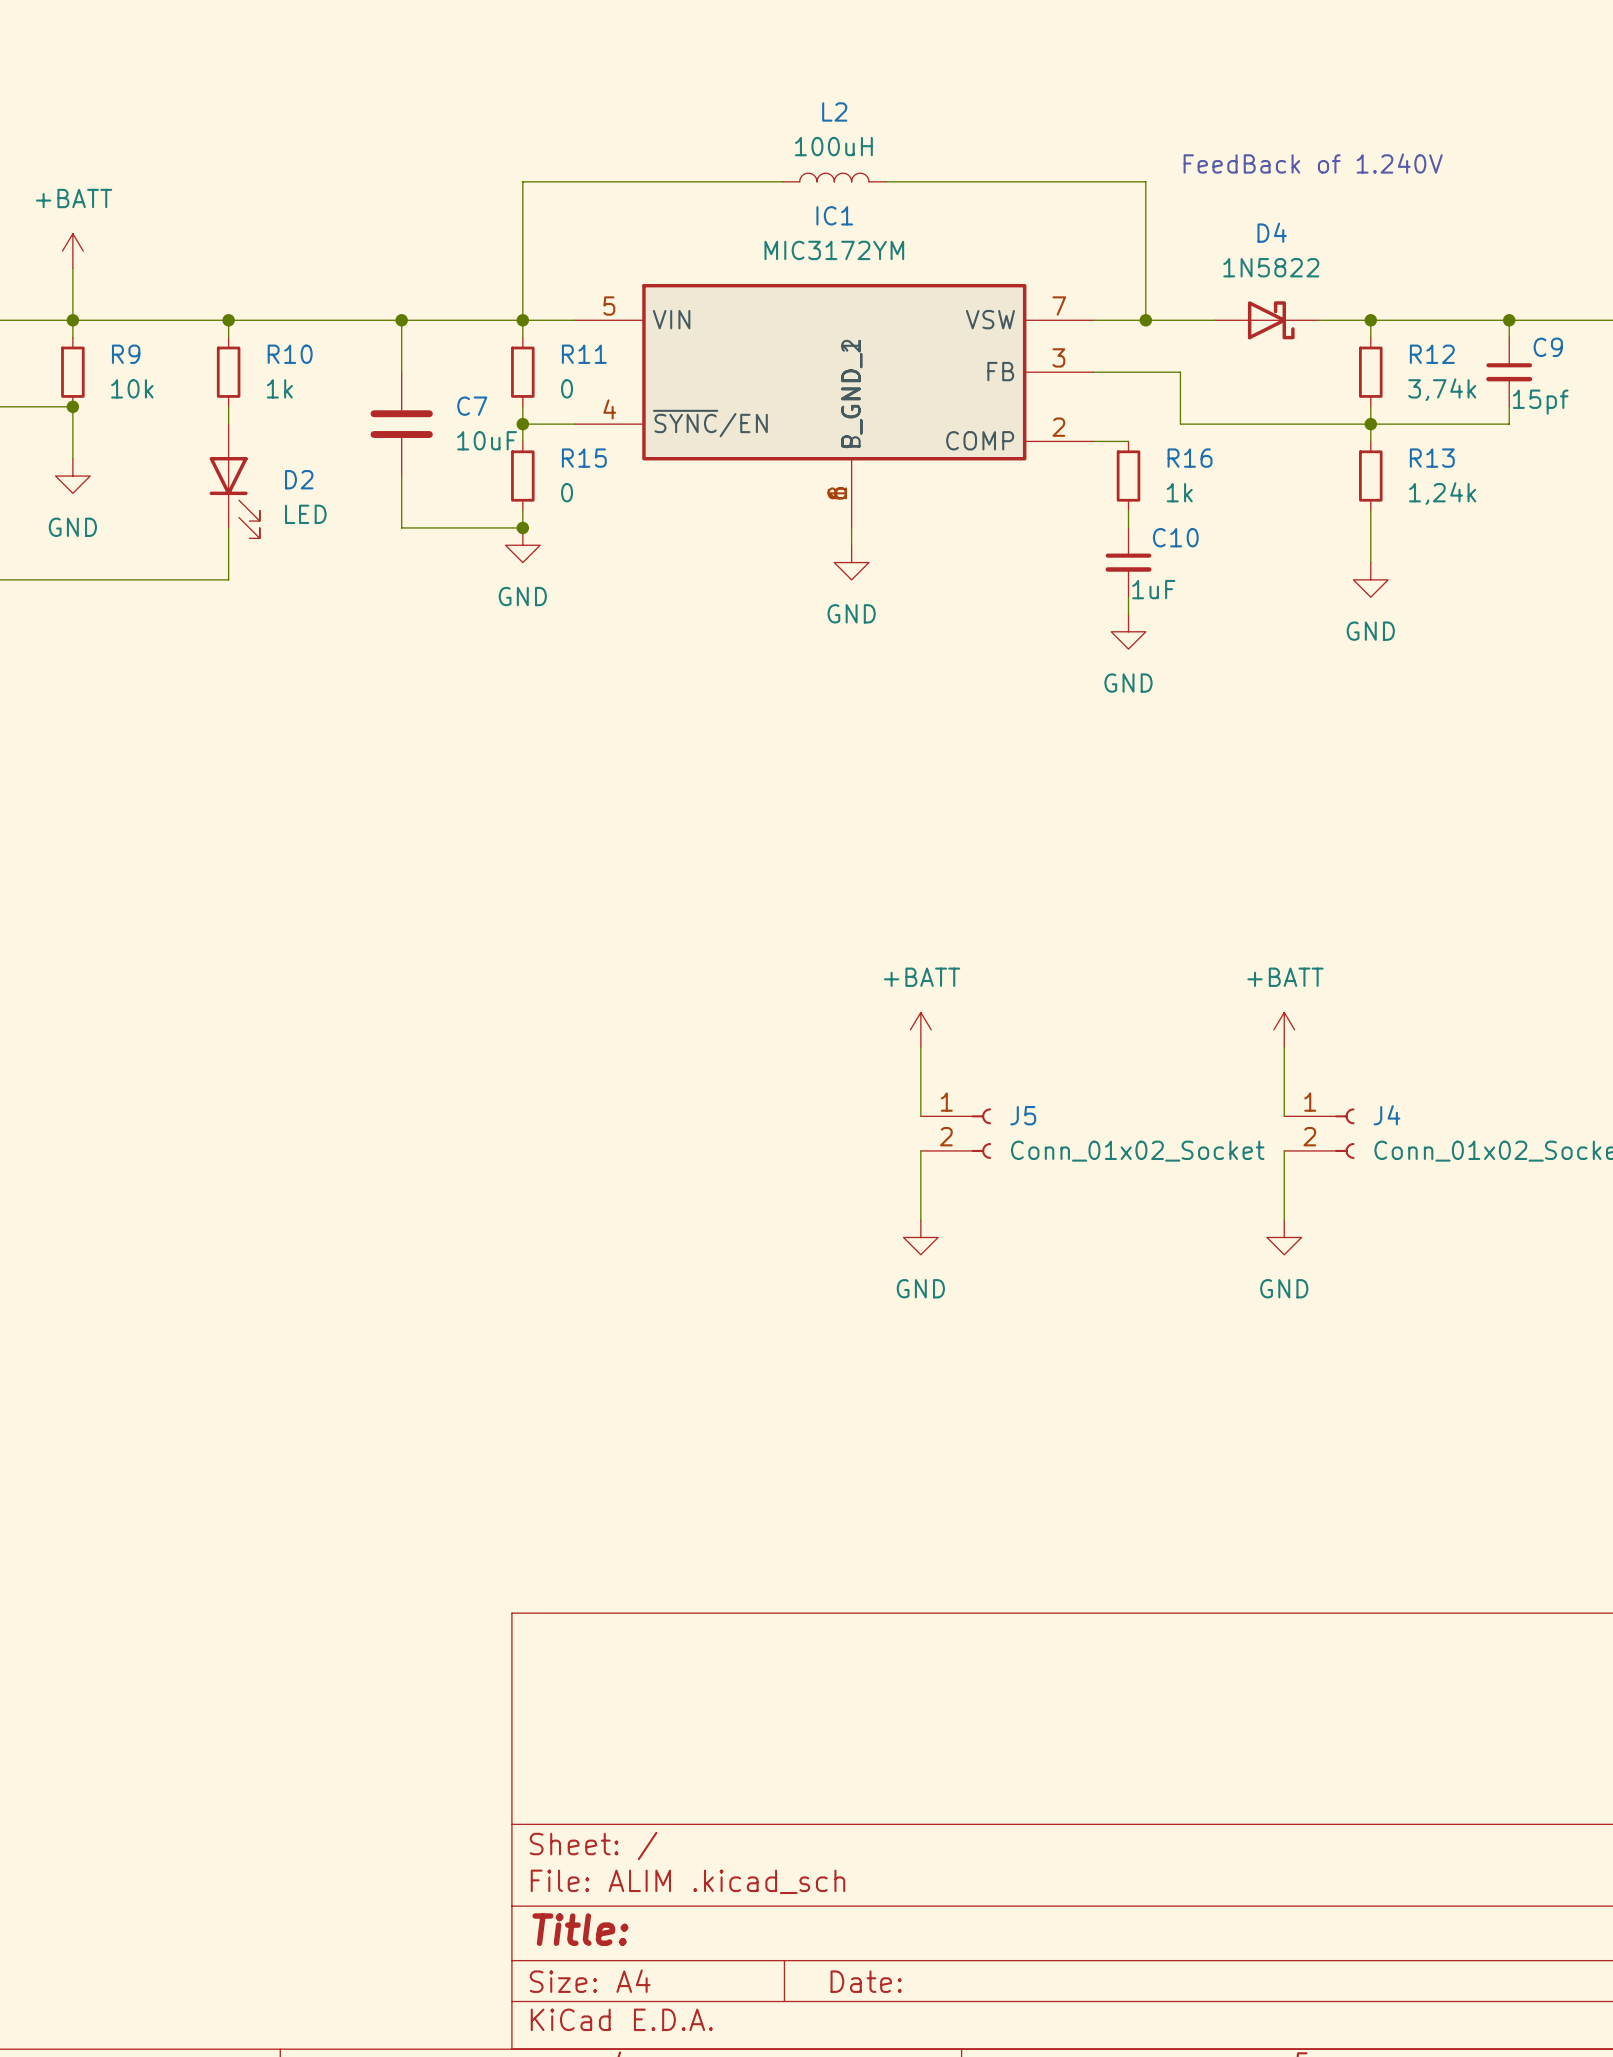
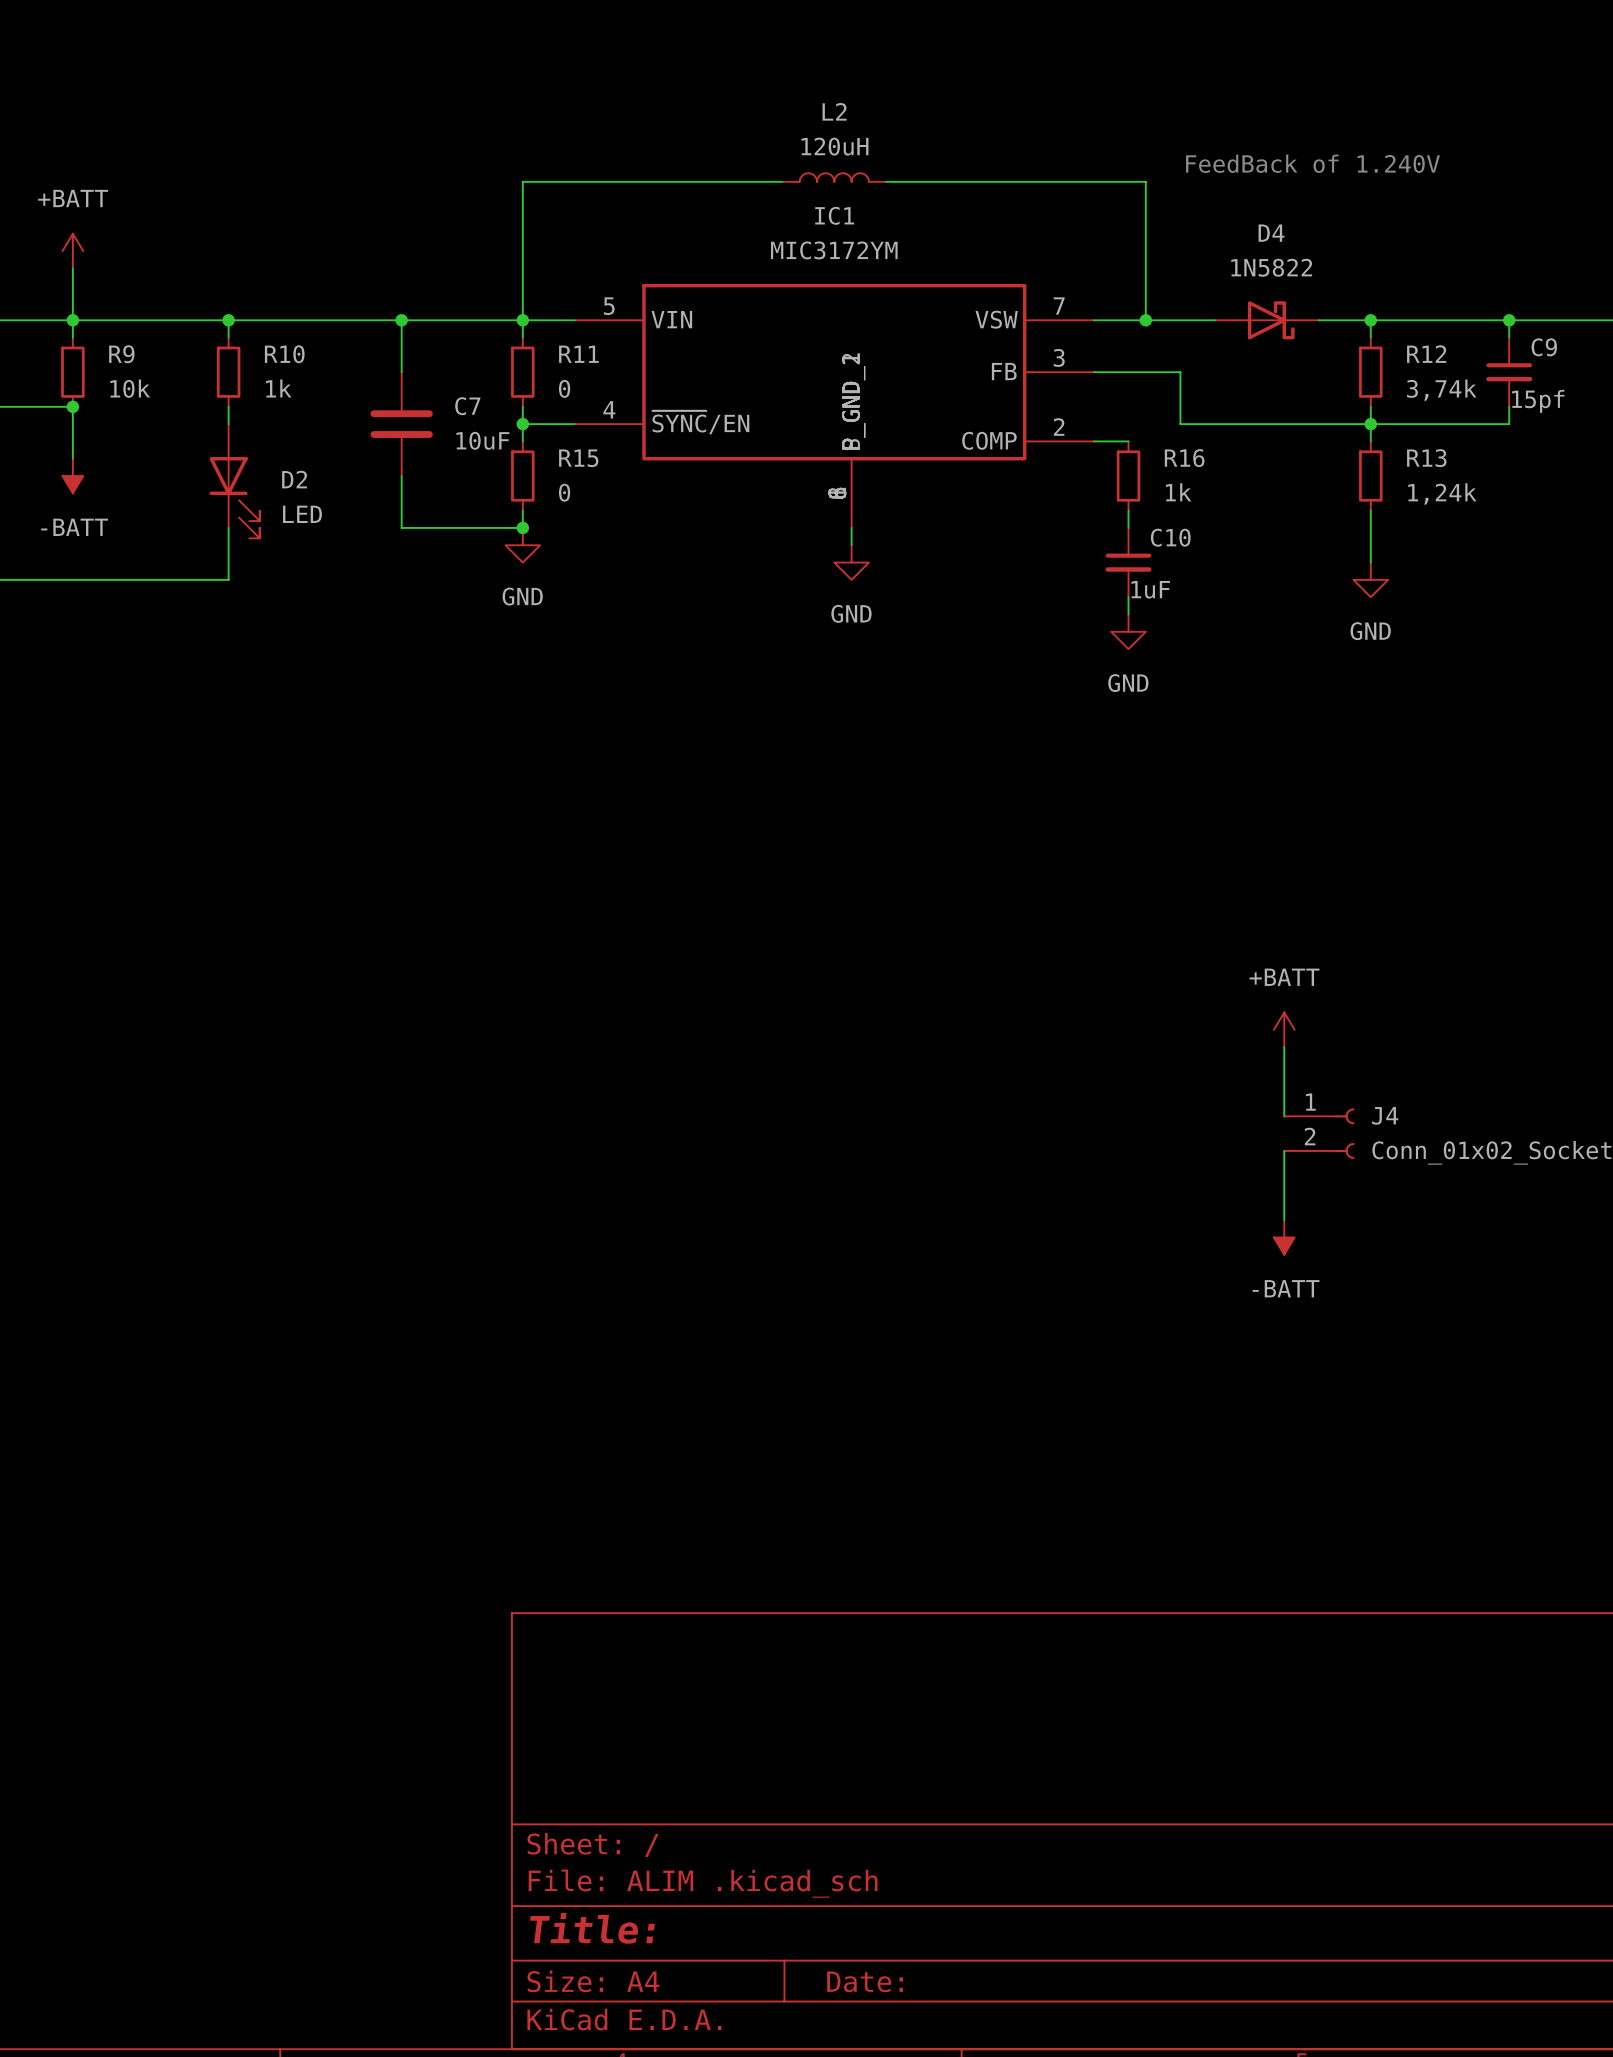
L2 value: 100uH (833, 146) -> 120uH (834, 146)
power symbol: GND (72, 476) -> -BATT (72, 476)
power symbol: +BATT (920, 1029) -> none
wire: (920, 1047) (920, 1116) -> none
J5: Conn_01x02_Socket (955, 1133) -> none
wire: (920, 1150) (920, 1220) -> none
power symbol: GND (920, 1237) -> none
power symbol: GND (1284, 1237) -> -BATT (1284, 1237)

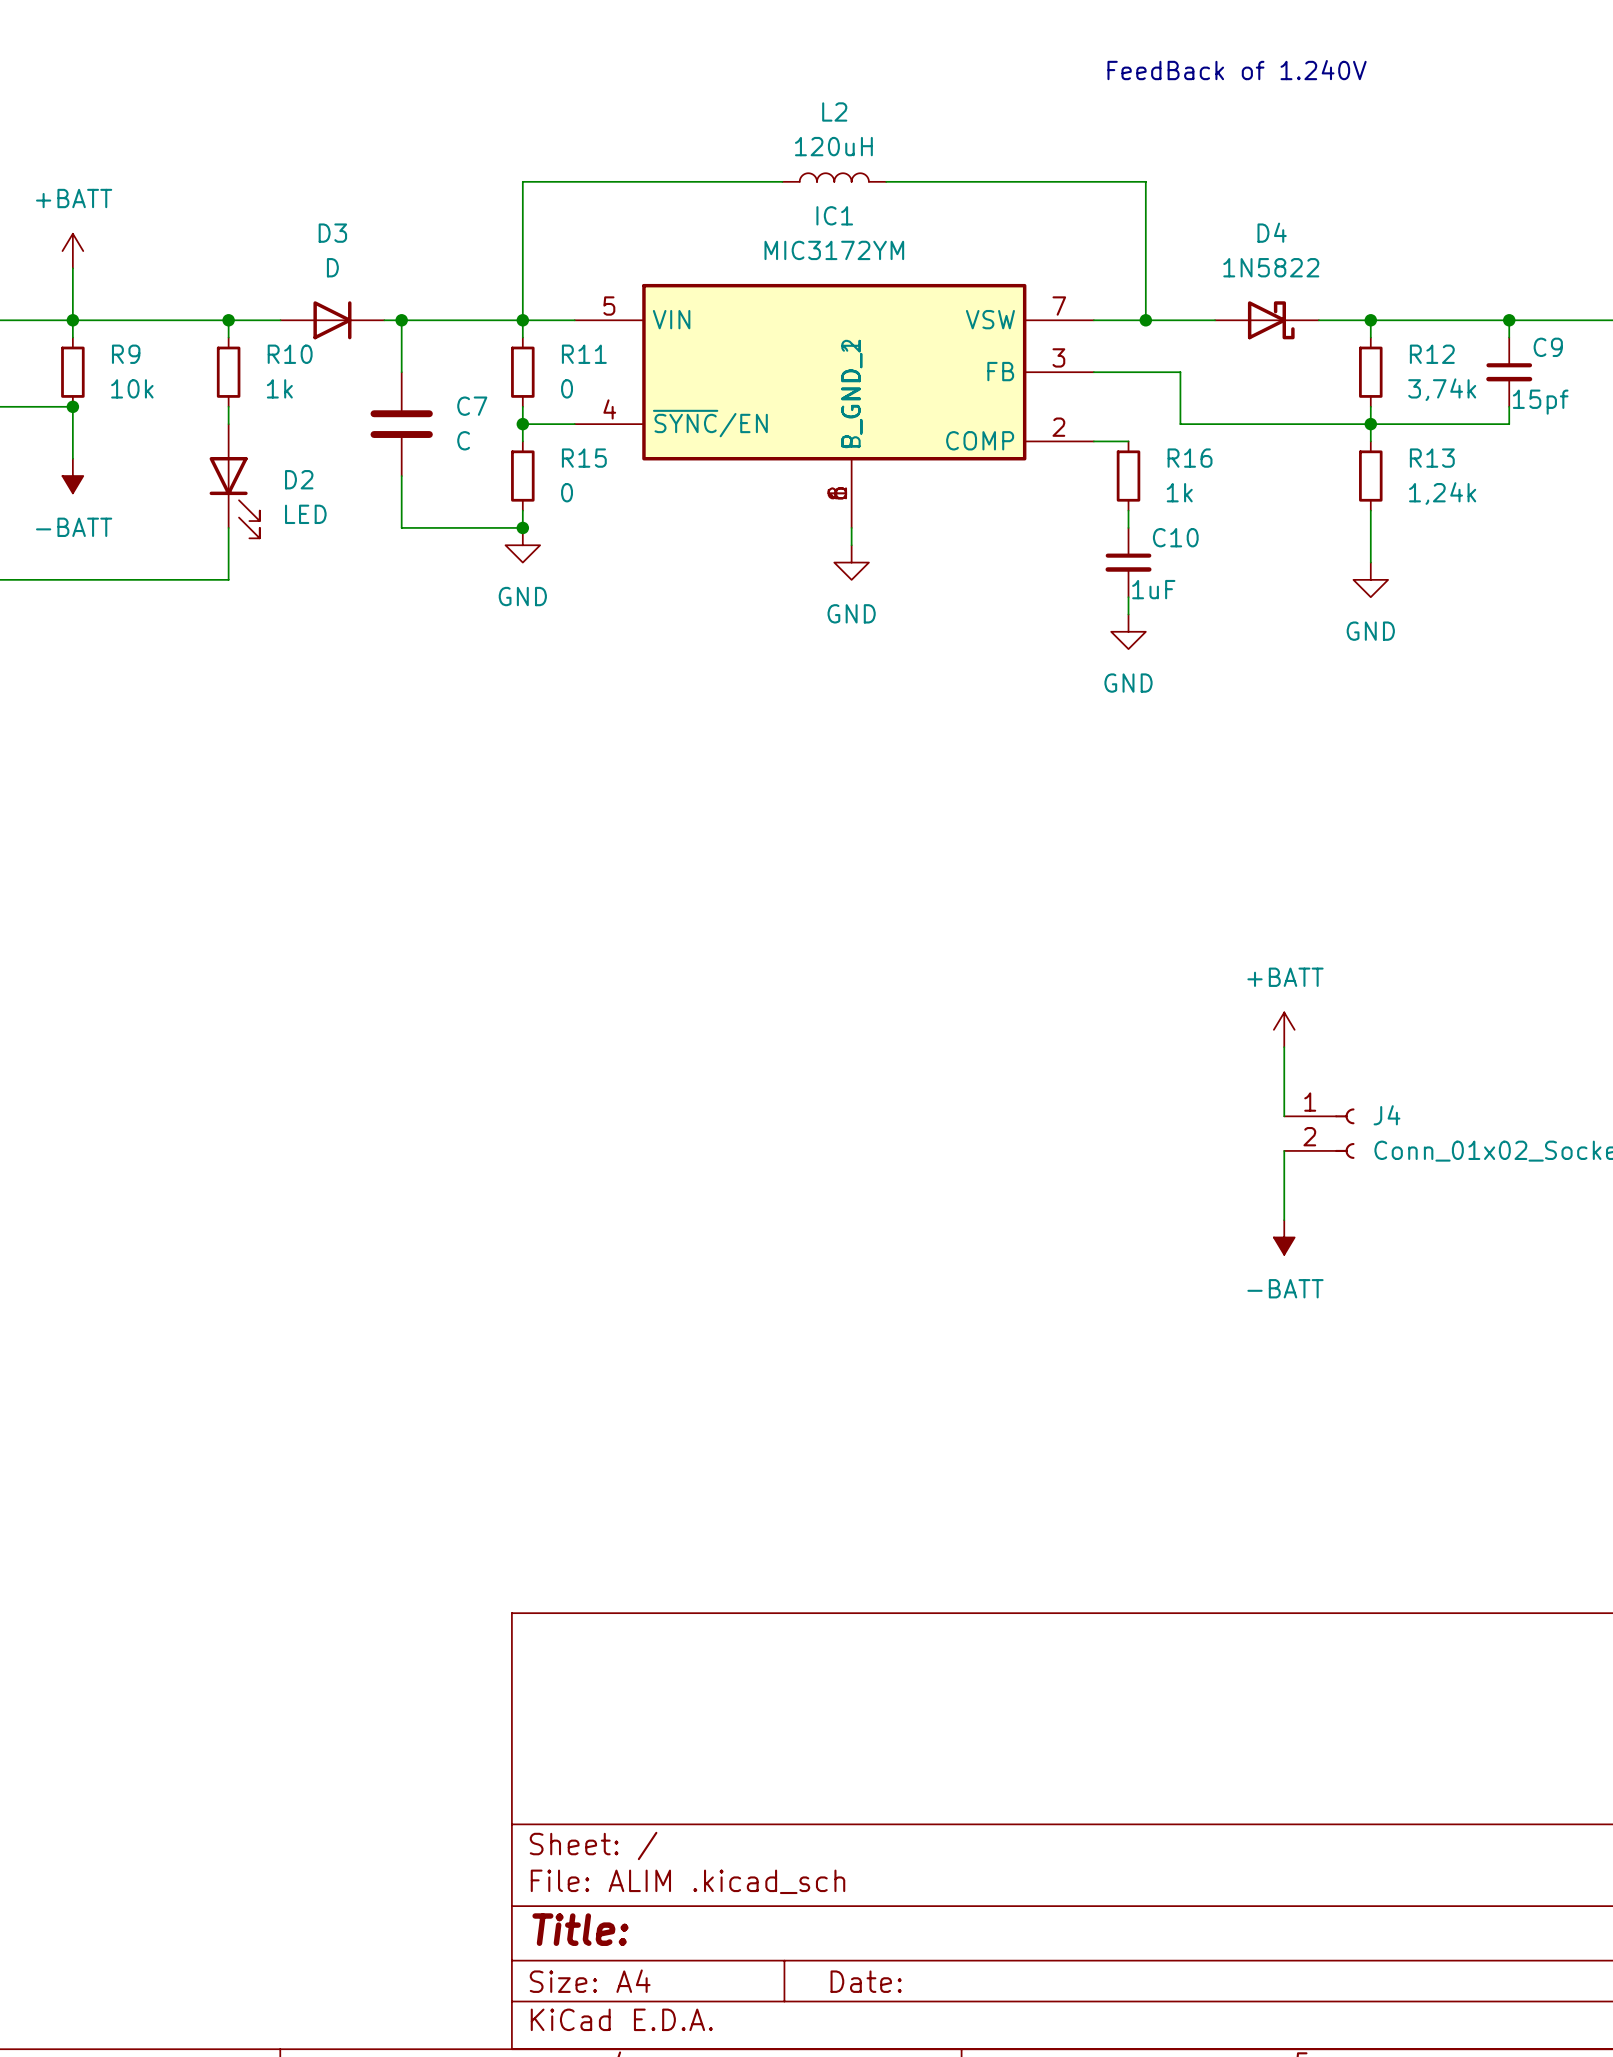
text position: FeedBack of 1.240V (1312, 163) -> FeedBack of 1.240V (1237, 70)
D3: none -> D (332, 320)
C7 value: 10uF (482, 440) -> C (463, 440)

